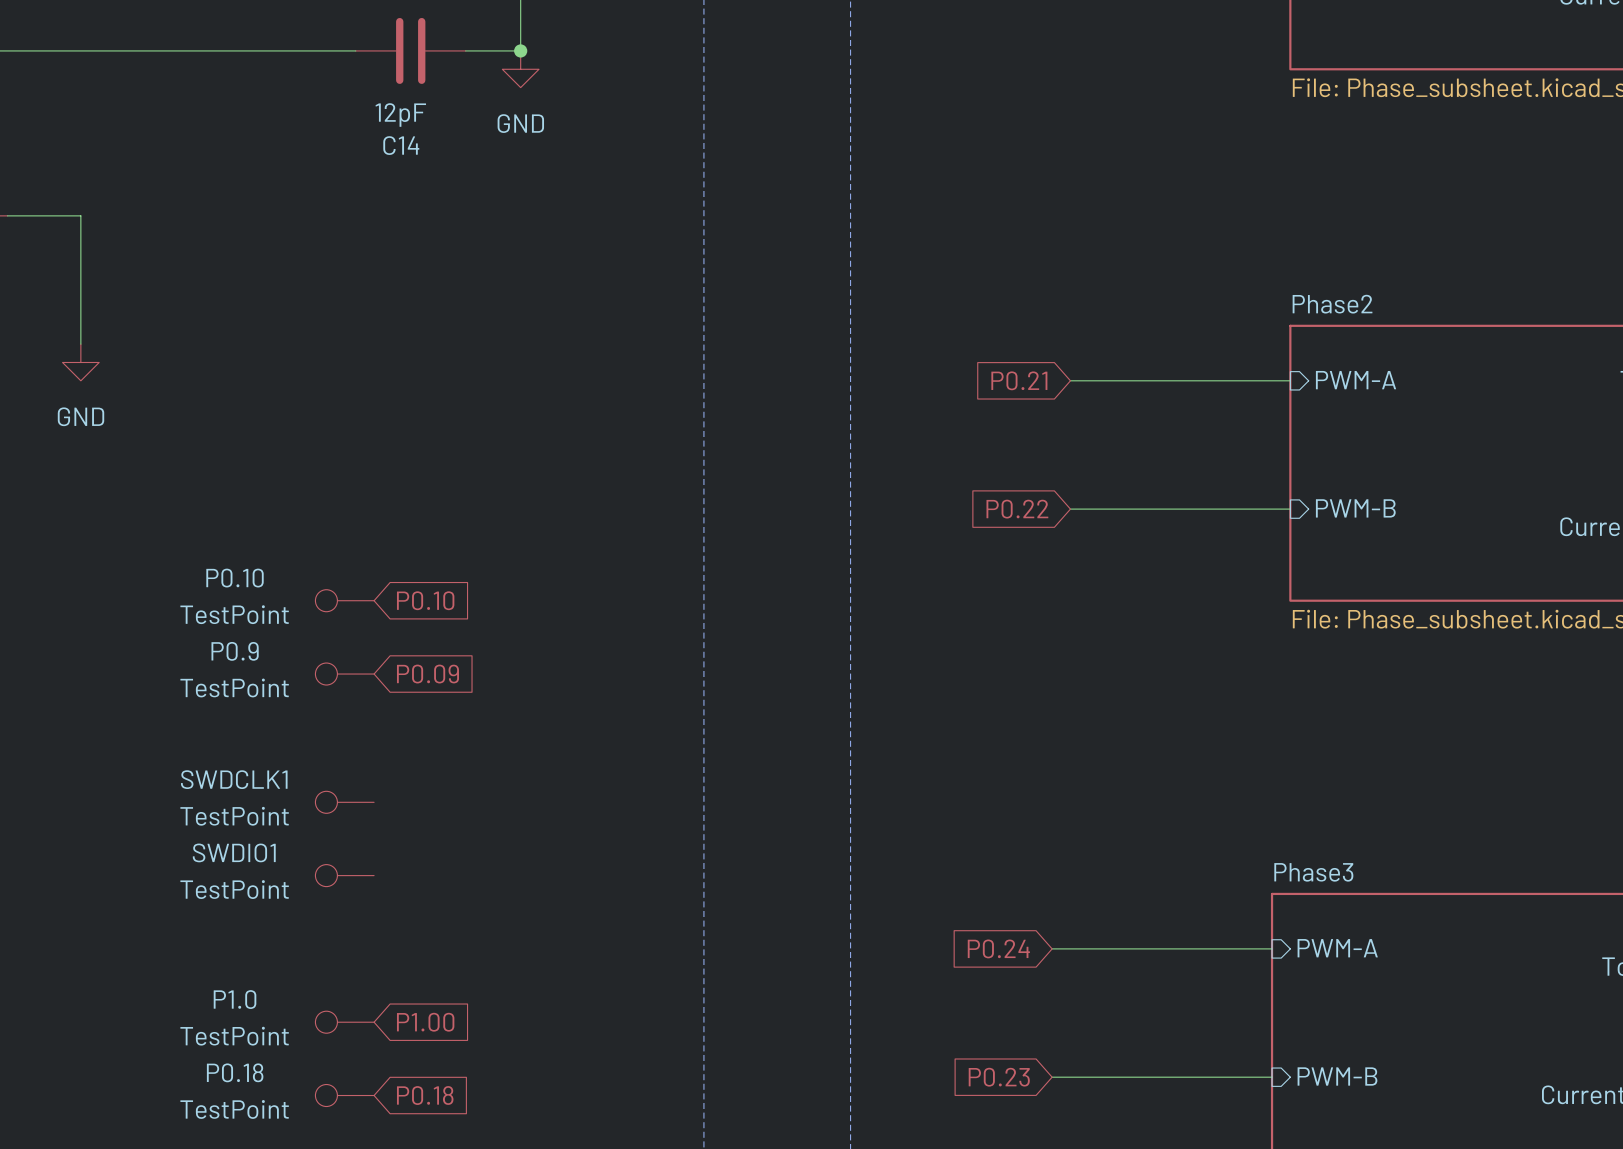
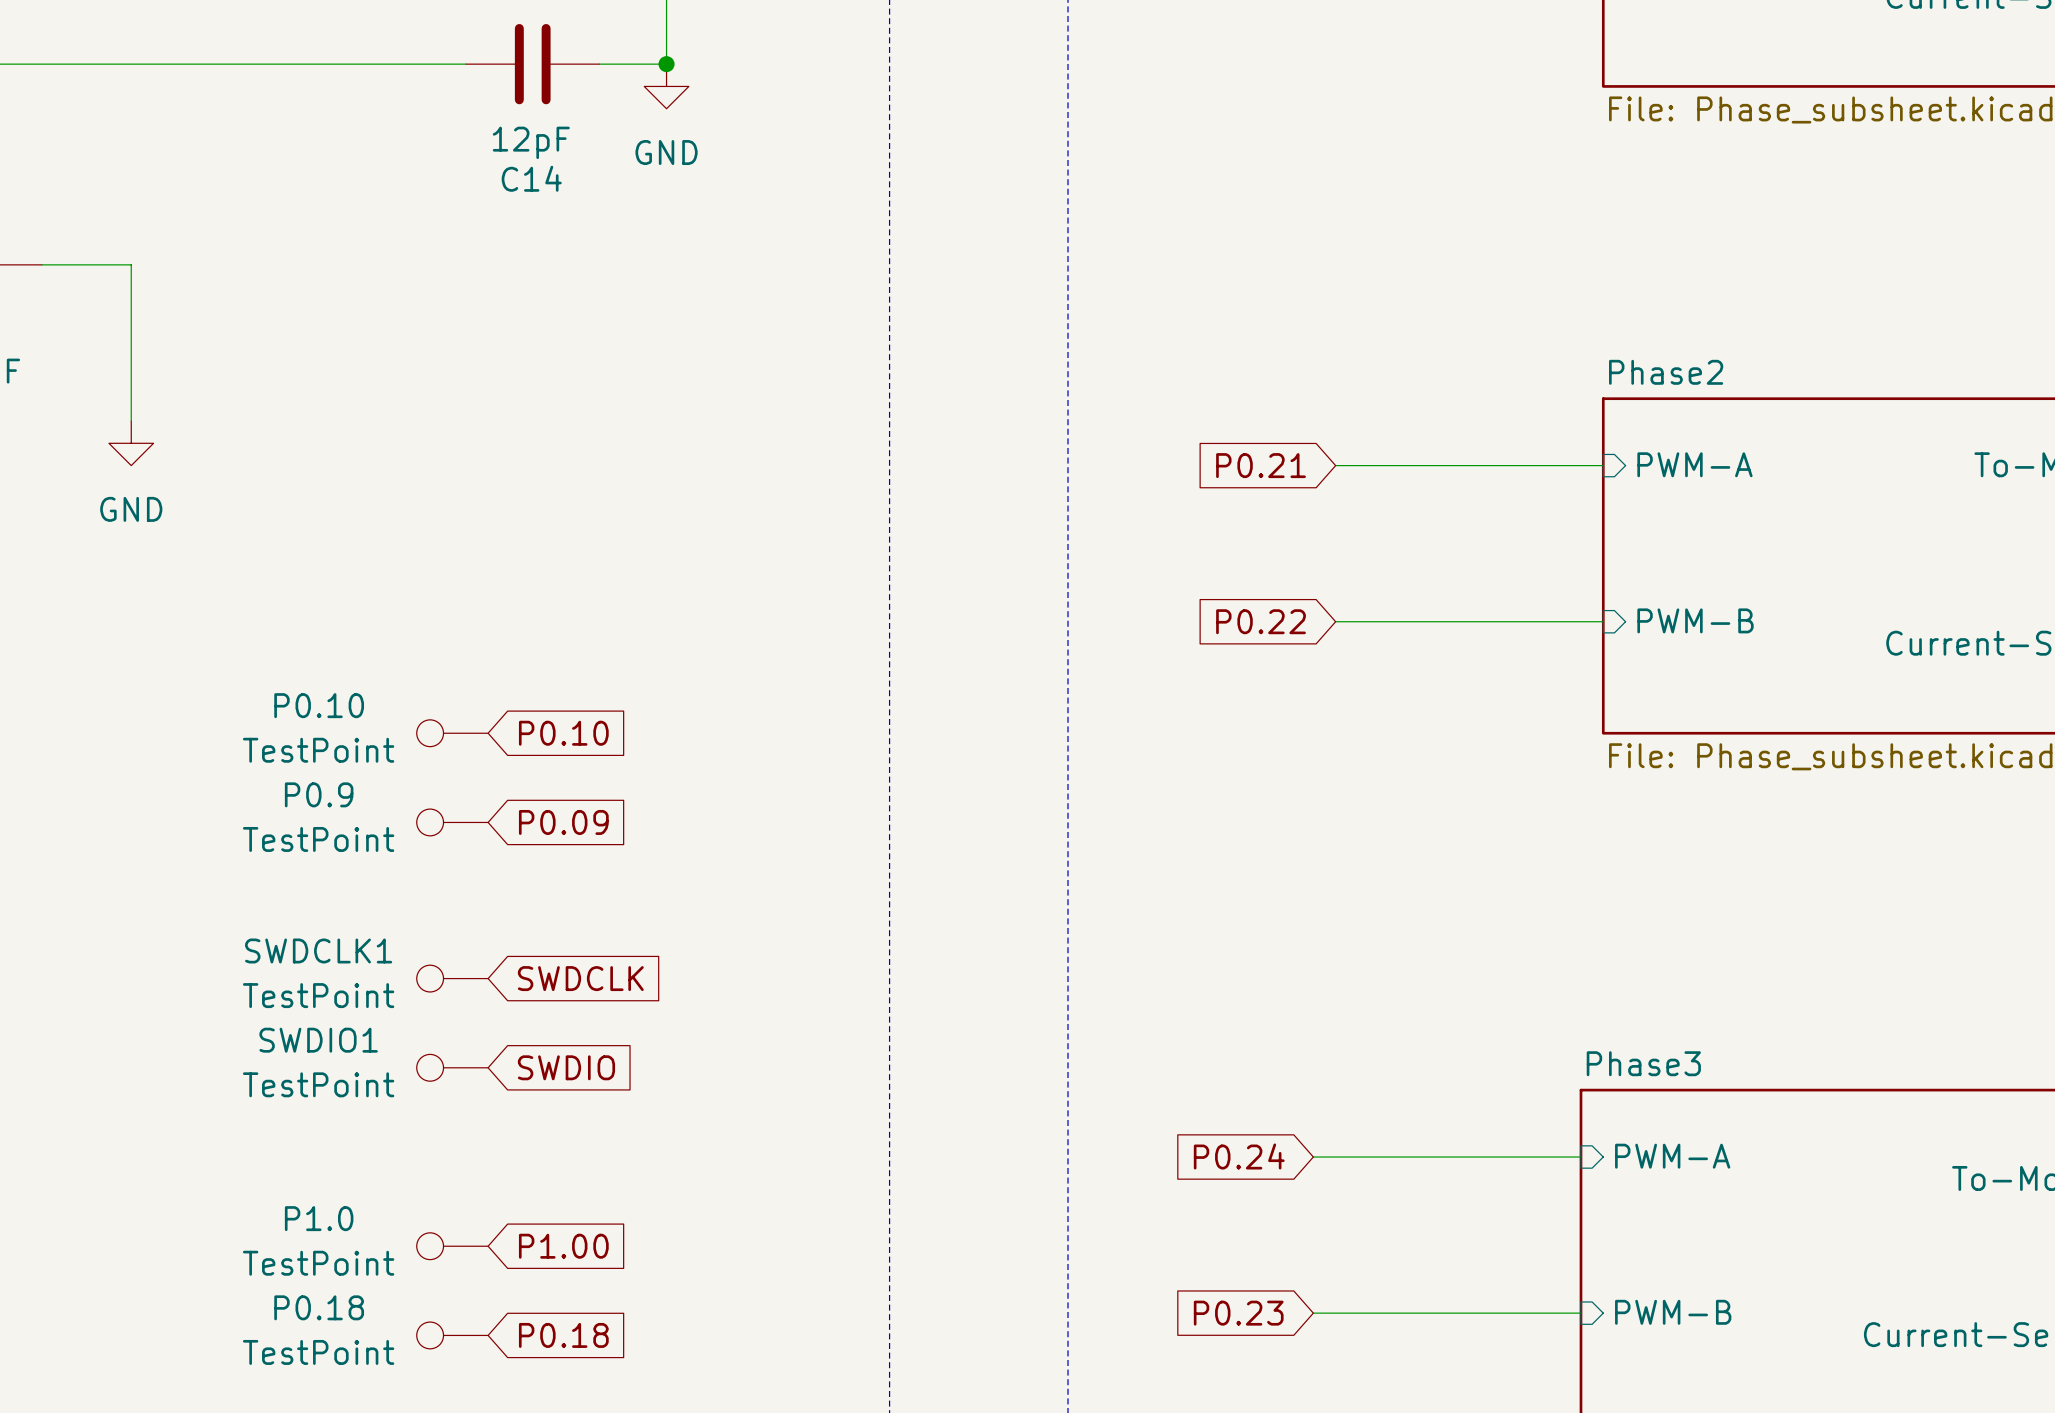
global label: none -> SWDCLK (580, 978)
global label: none -> SWDIO (566, 1067)

